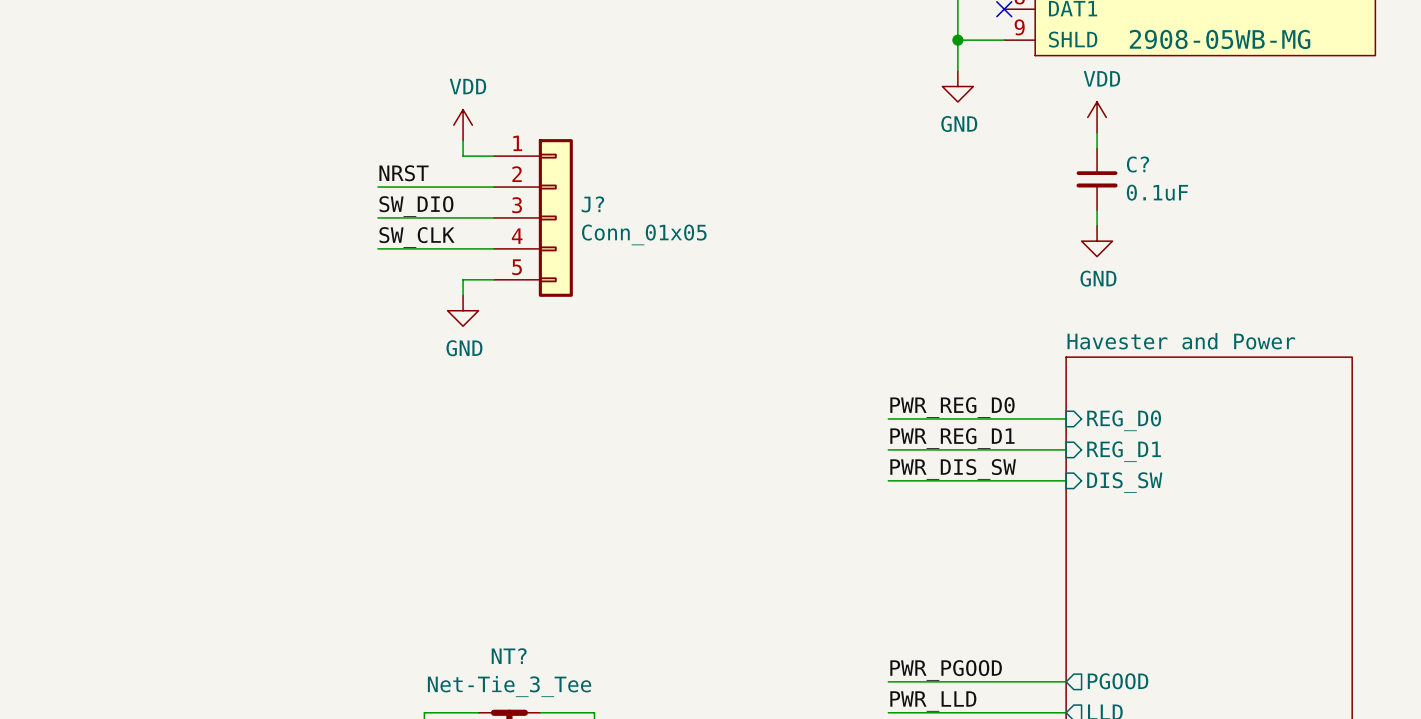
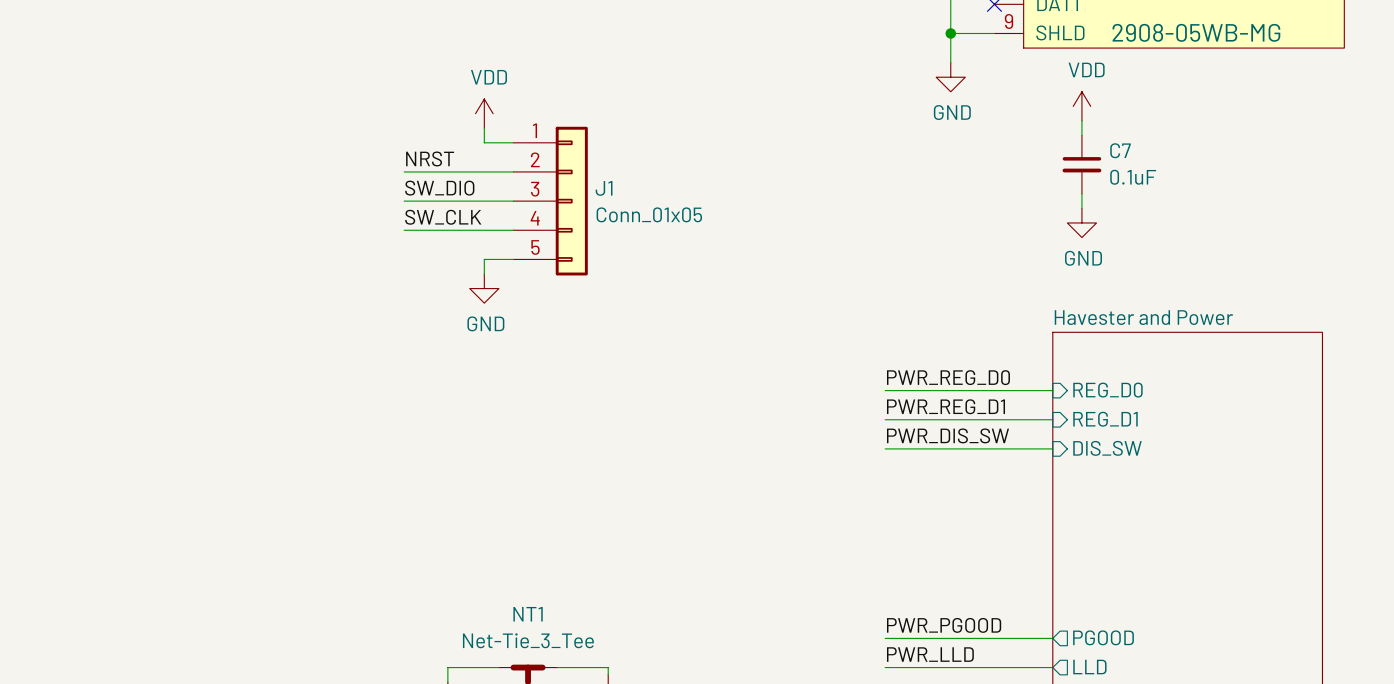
C? name: C? (1137, 164) -> C7 (1120, 150)
J? name: J? (592, 204) -> J1 (604, 188)
NT? name: NT? (509, 656) -> NT1 (528, 614)

